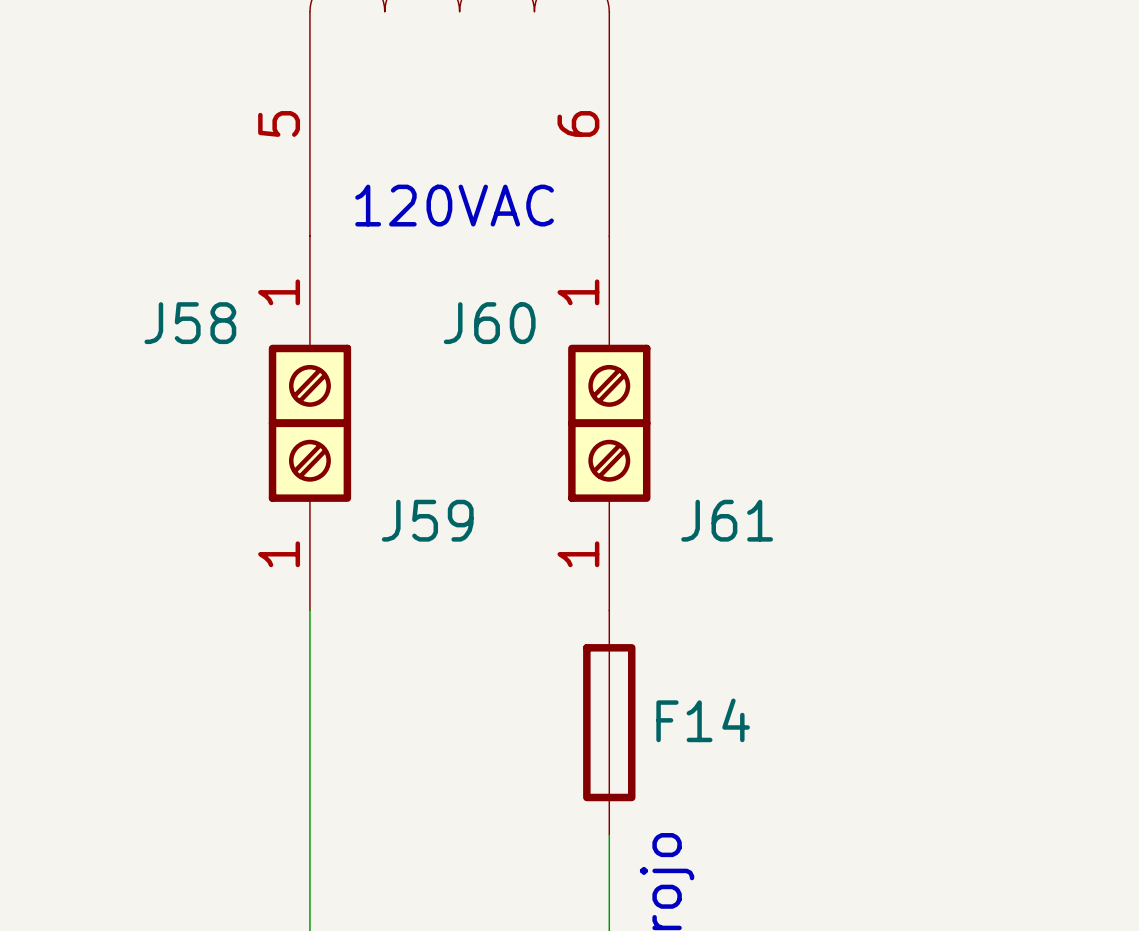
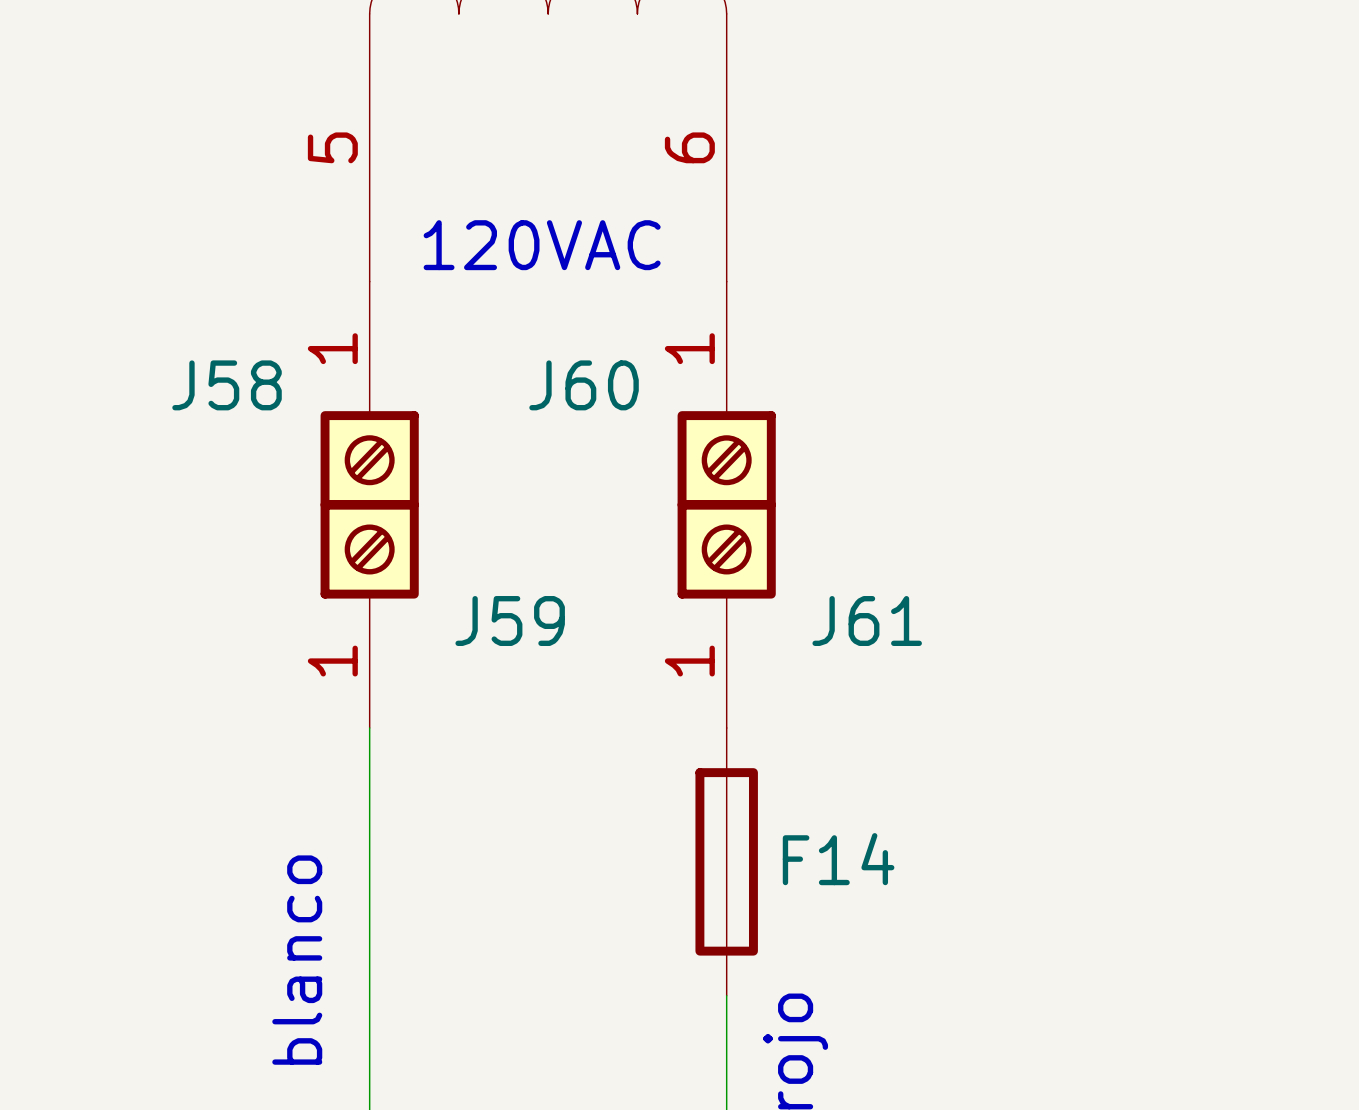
text: none -> blanco (297, 960)

